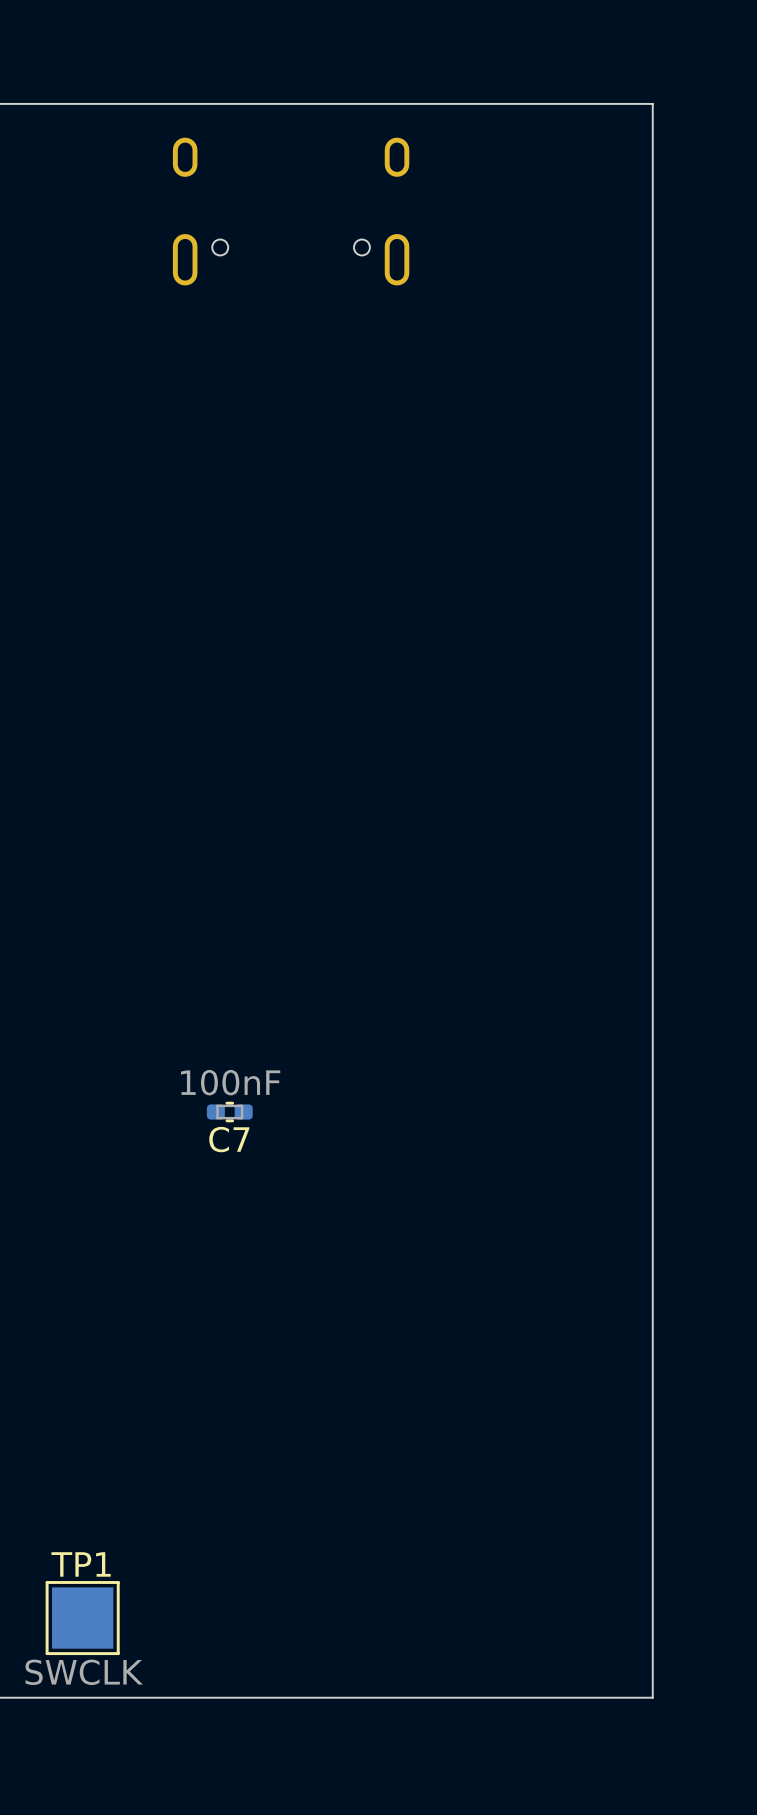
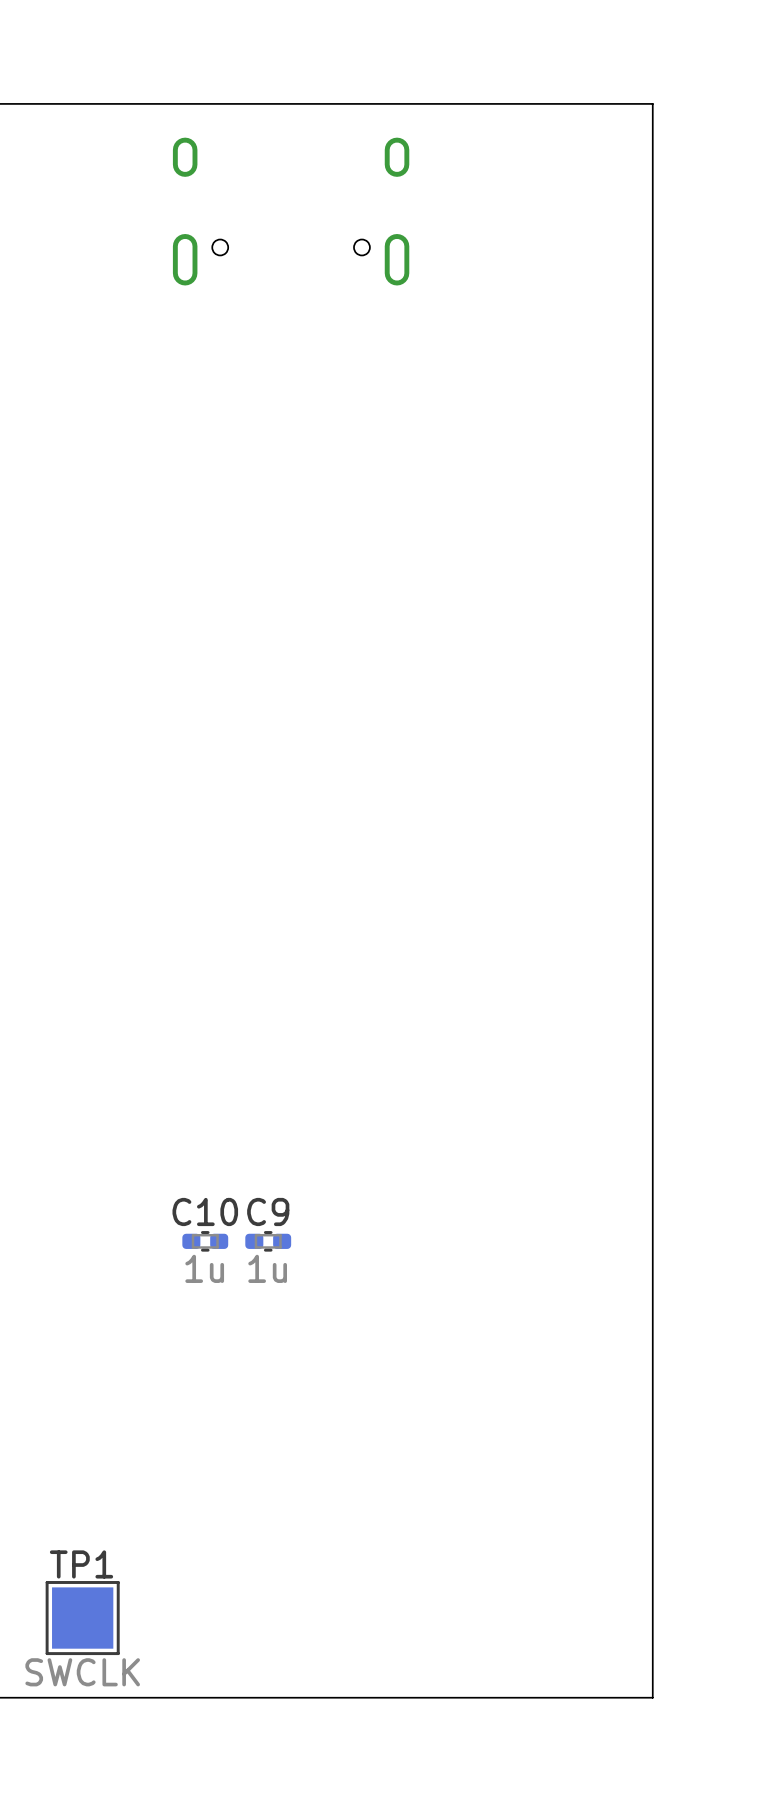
C7: 100nF (229, 1112) -> none
C10: none -> 1u (205, 1241)
C9: none -> 1u (268, 1241)

